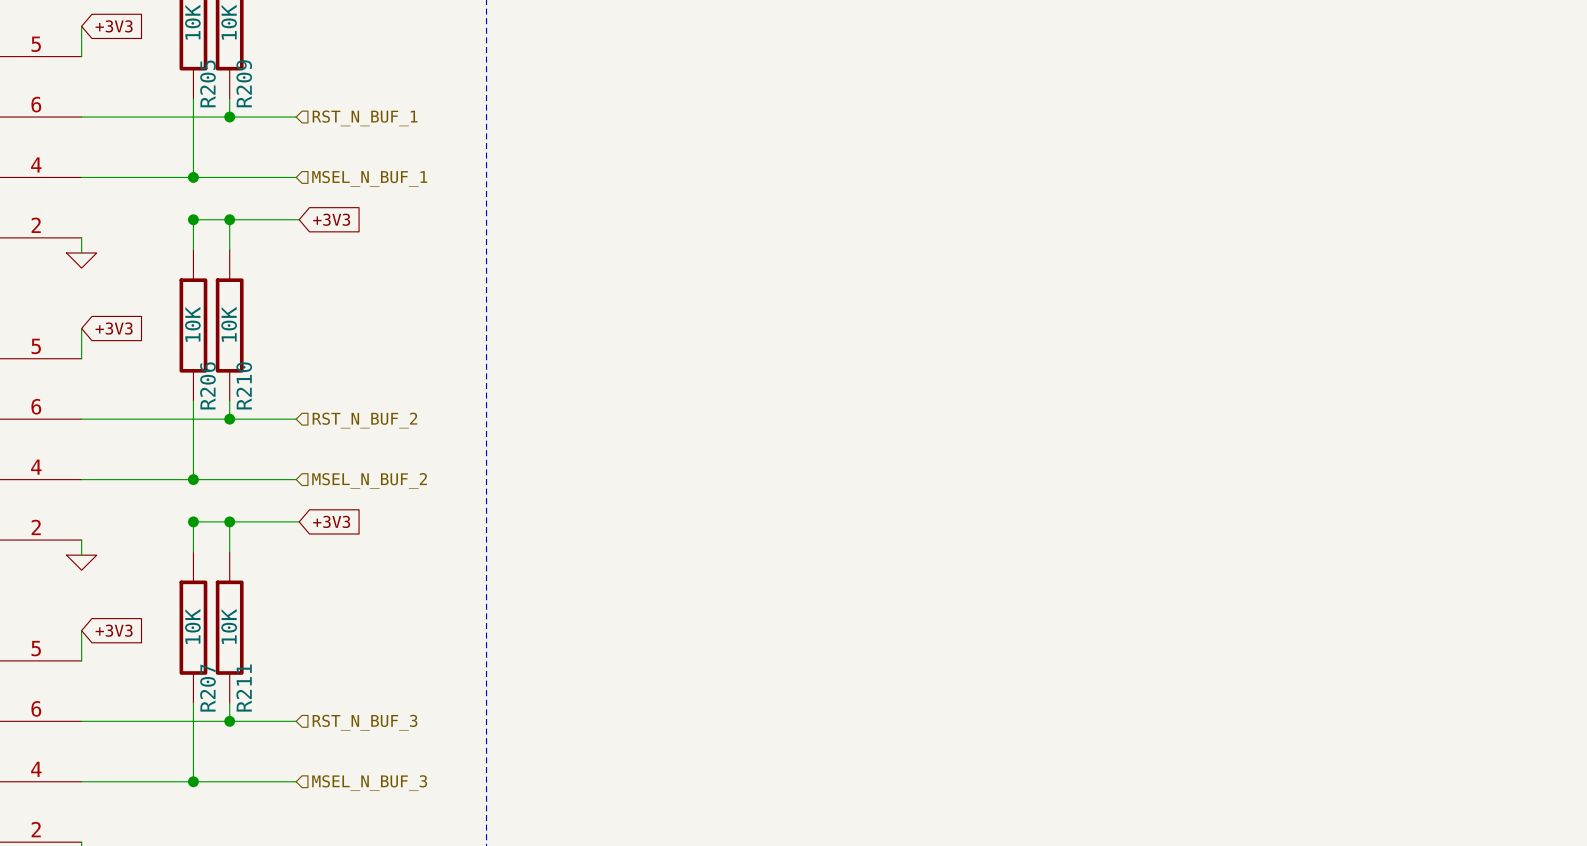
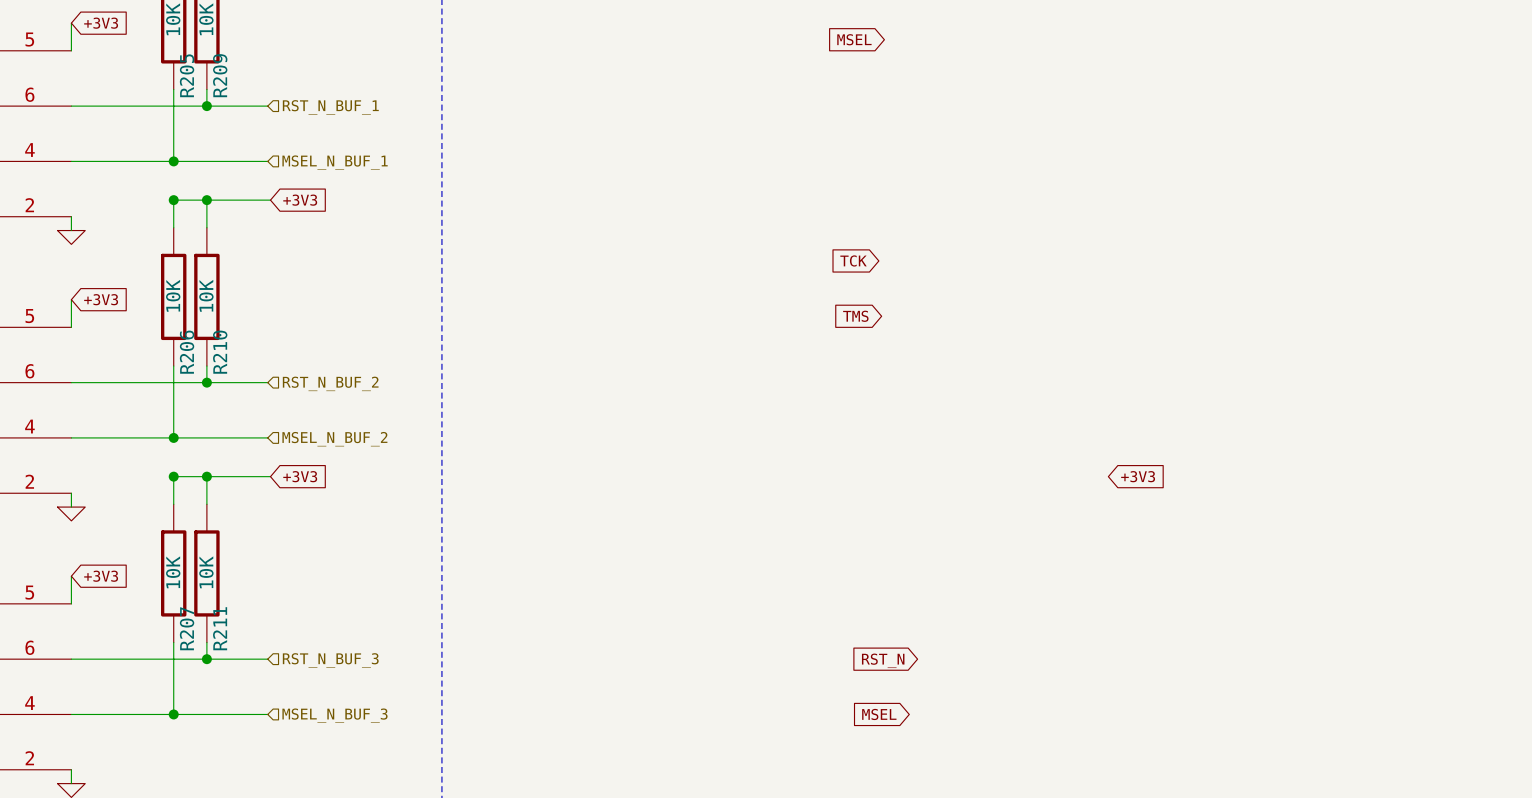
global label: none -> MSEL (854, 39)
global label: none -> TCK (853, 260)
global label: none -> TMS (855, 316)
global label: none -> +3V3 (1138, 476)
global label: none -> RST_N (883, 660)
global label: none -> MSEL (879, 714)

